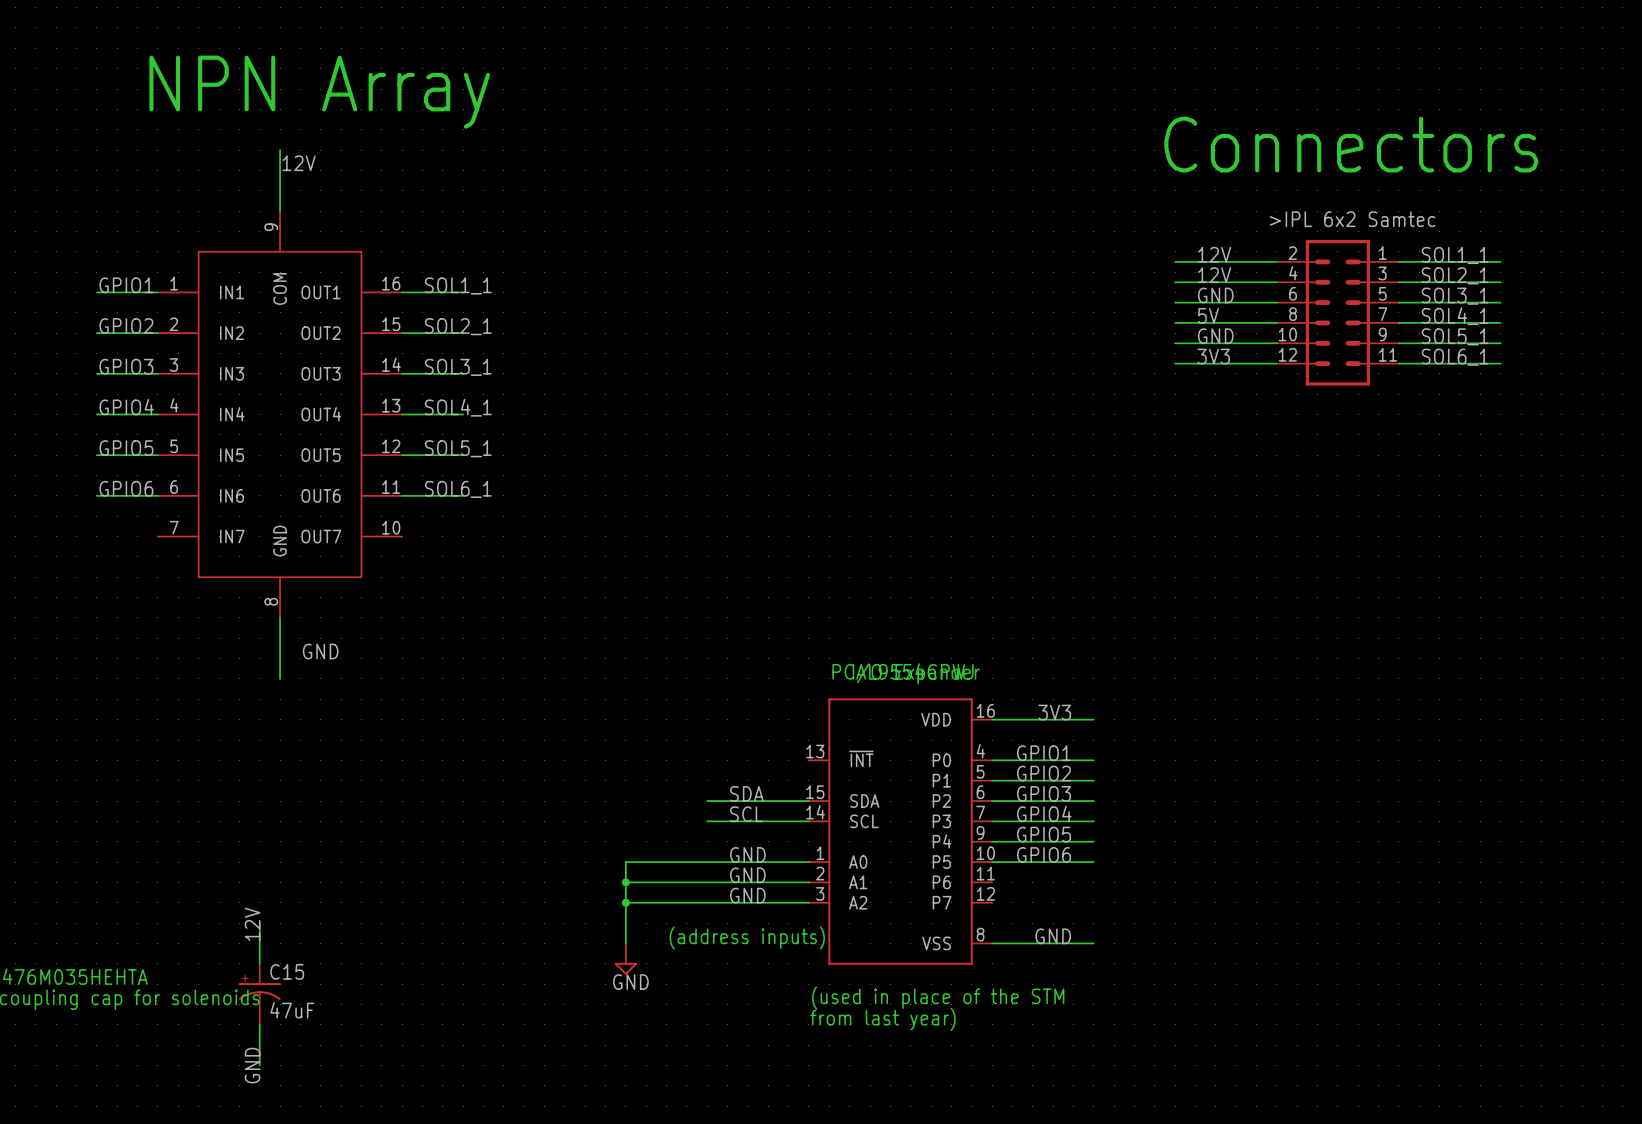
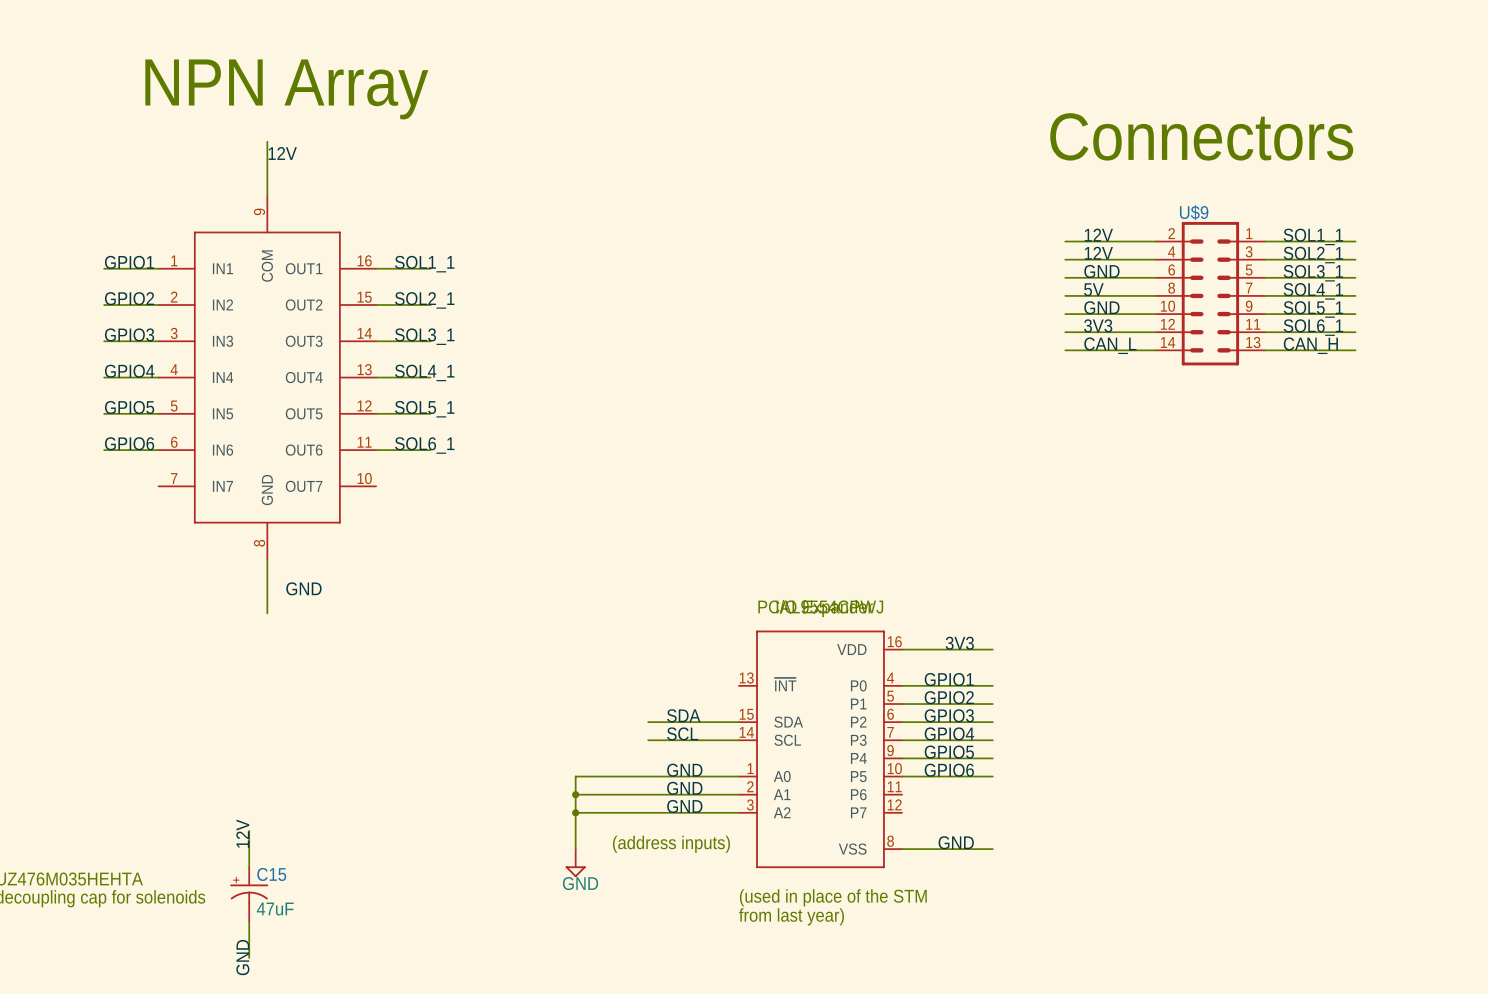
part: (1337, 312) -> none
U$9: none -> (1210, 293)
label: none -> CAN_L (1110, 345)
label: none -> CAN_H (1310, 345)
wire: none -> (1065, 350) (1156, 350)
wire: none -> (1264, 350) (1355, 350)

